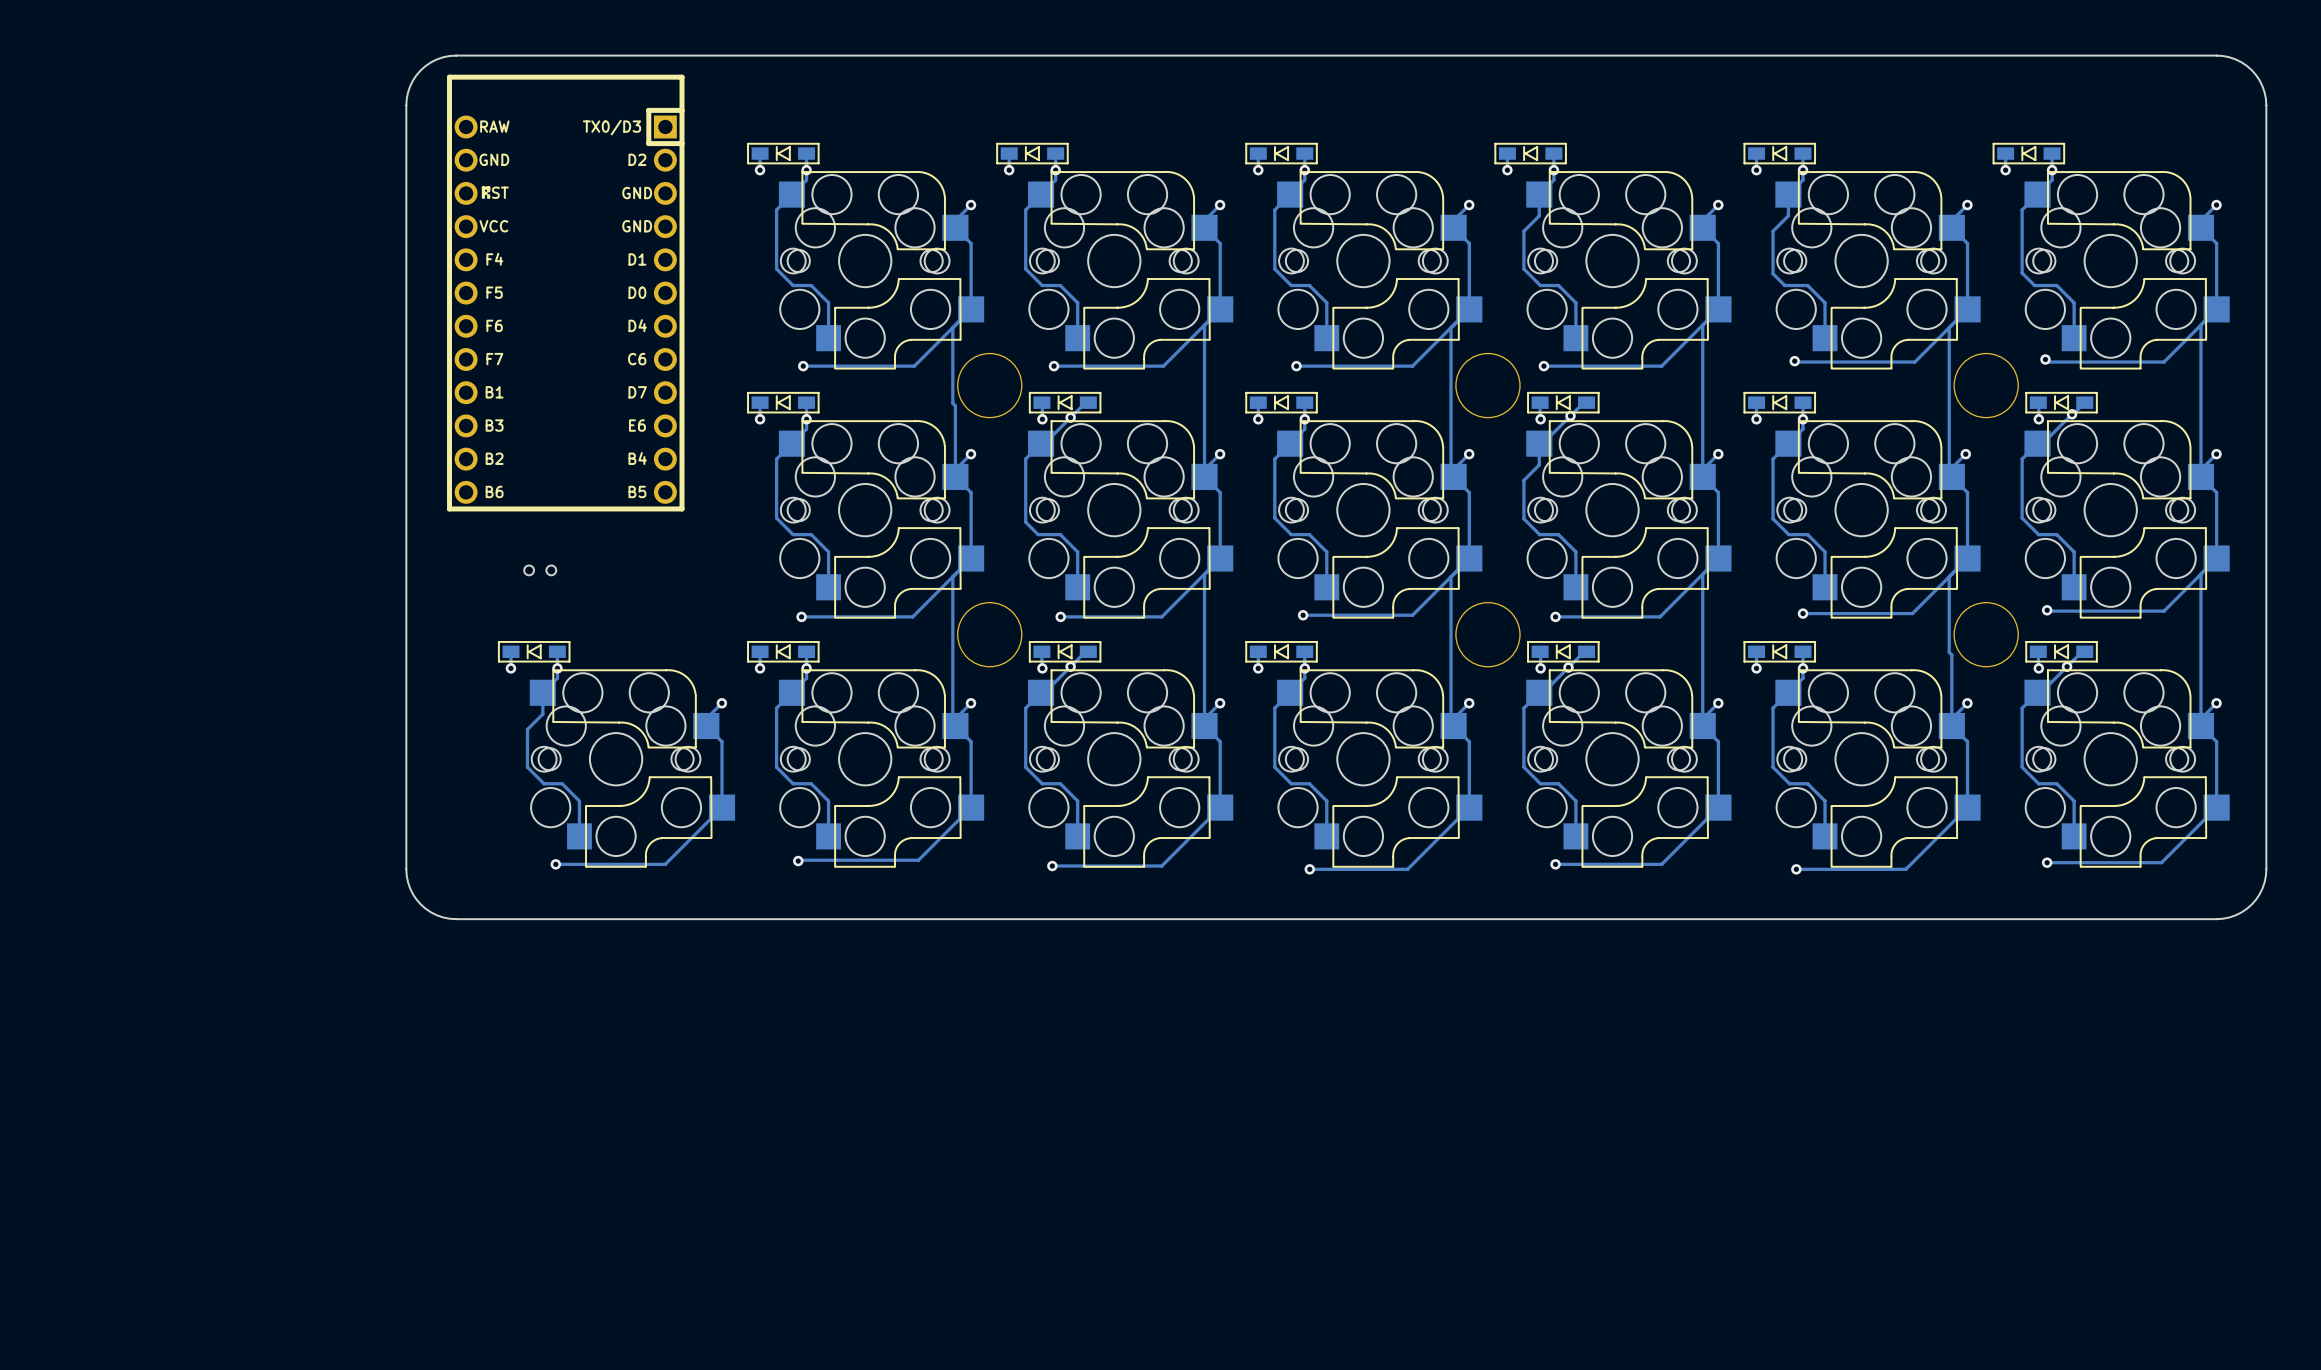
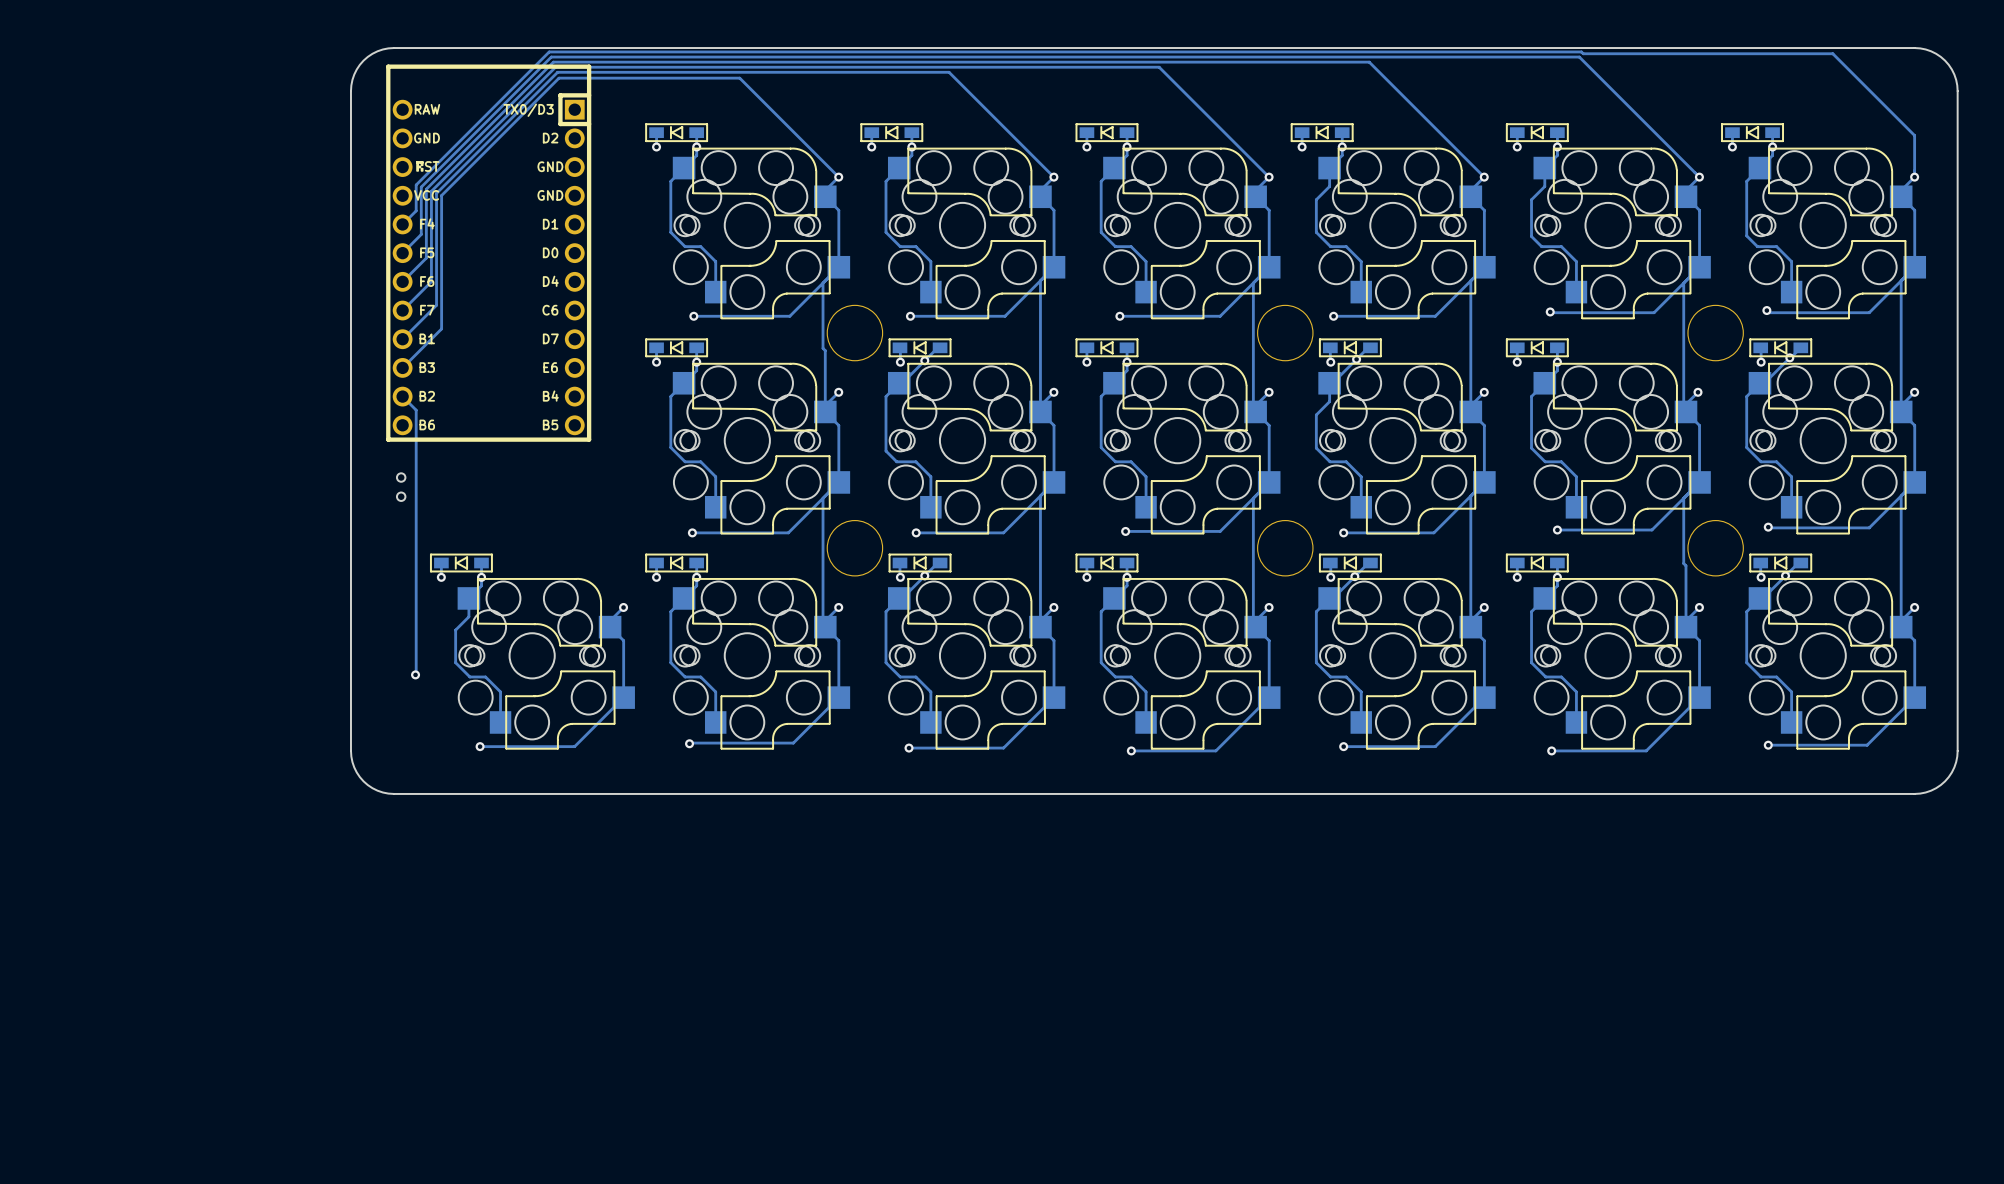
track: none -> (838, 177) (739, 78) (558, 78) (441, 195) (441, 328) (402, 367)
track: none -> (1053, 177) (949, 72) (557, 72) (436, 193) (436, 305) (402, 339)
track: none -> (1269, 177) (1159, 67) (555, 67) (431, 191) (431, 281) (402, 310)
track: none -> (1484, 177) (1369, 62) (553, 62) (426, 189) (426, 258) (402, 281)
track: none -> (1699, 177) (1579, 57) (551, 57) (421, 187) (421, 234) (402, 253)
track: none -> (1914, 177) (1914, 135) (1832, 53) (549, 51) (416, 184) (416, 210) (402, 224)
track: none -> (402, 396) (416, 410) (415, 674)
part rotation: 0° (540, 570) -> 90° clockwise (401, 487)
part position: (540, 570) -> (401, 487)
via: none -> (415, 674)

